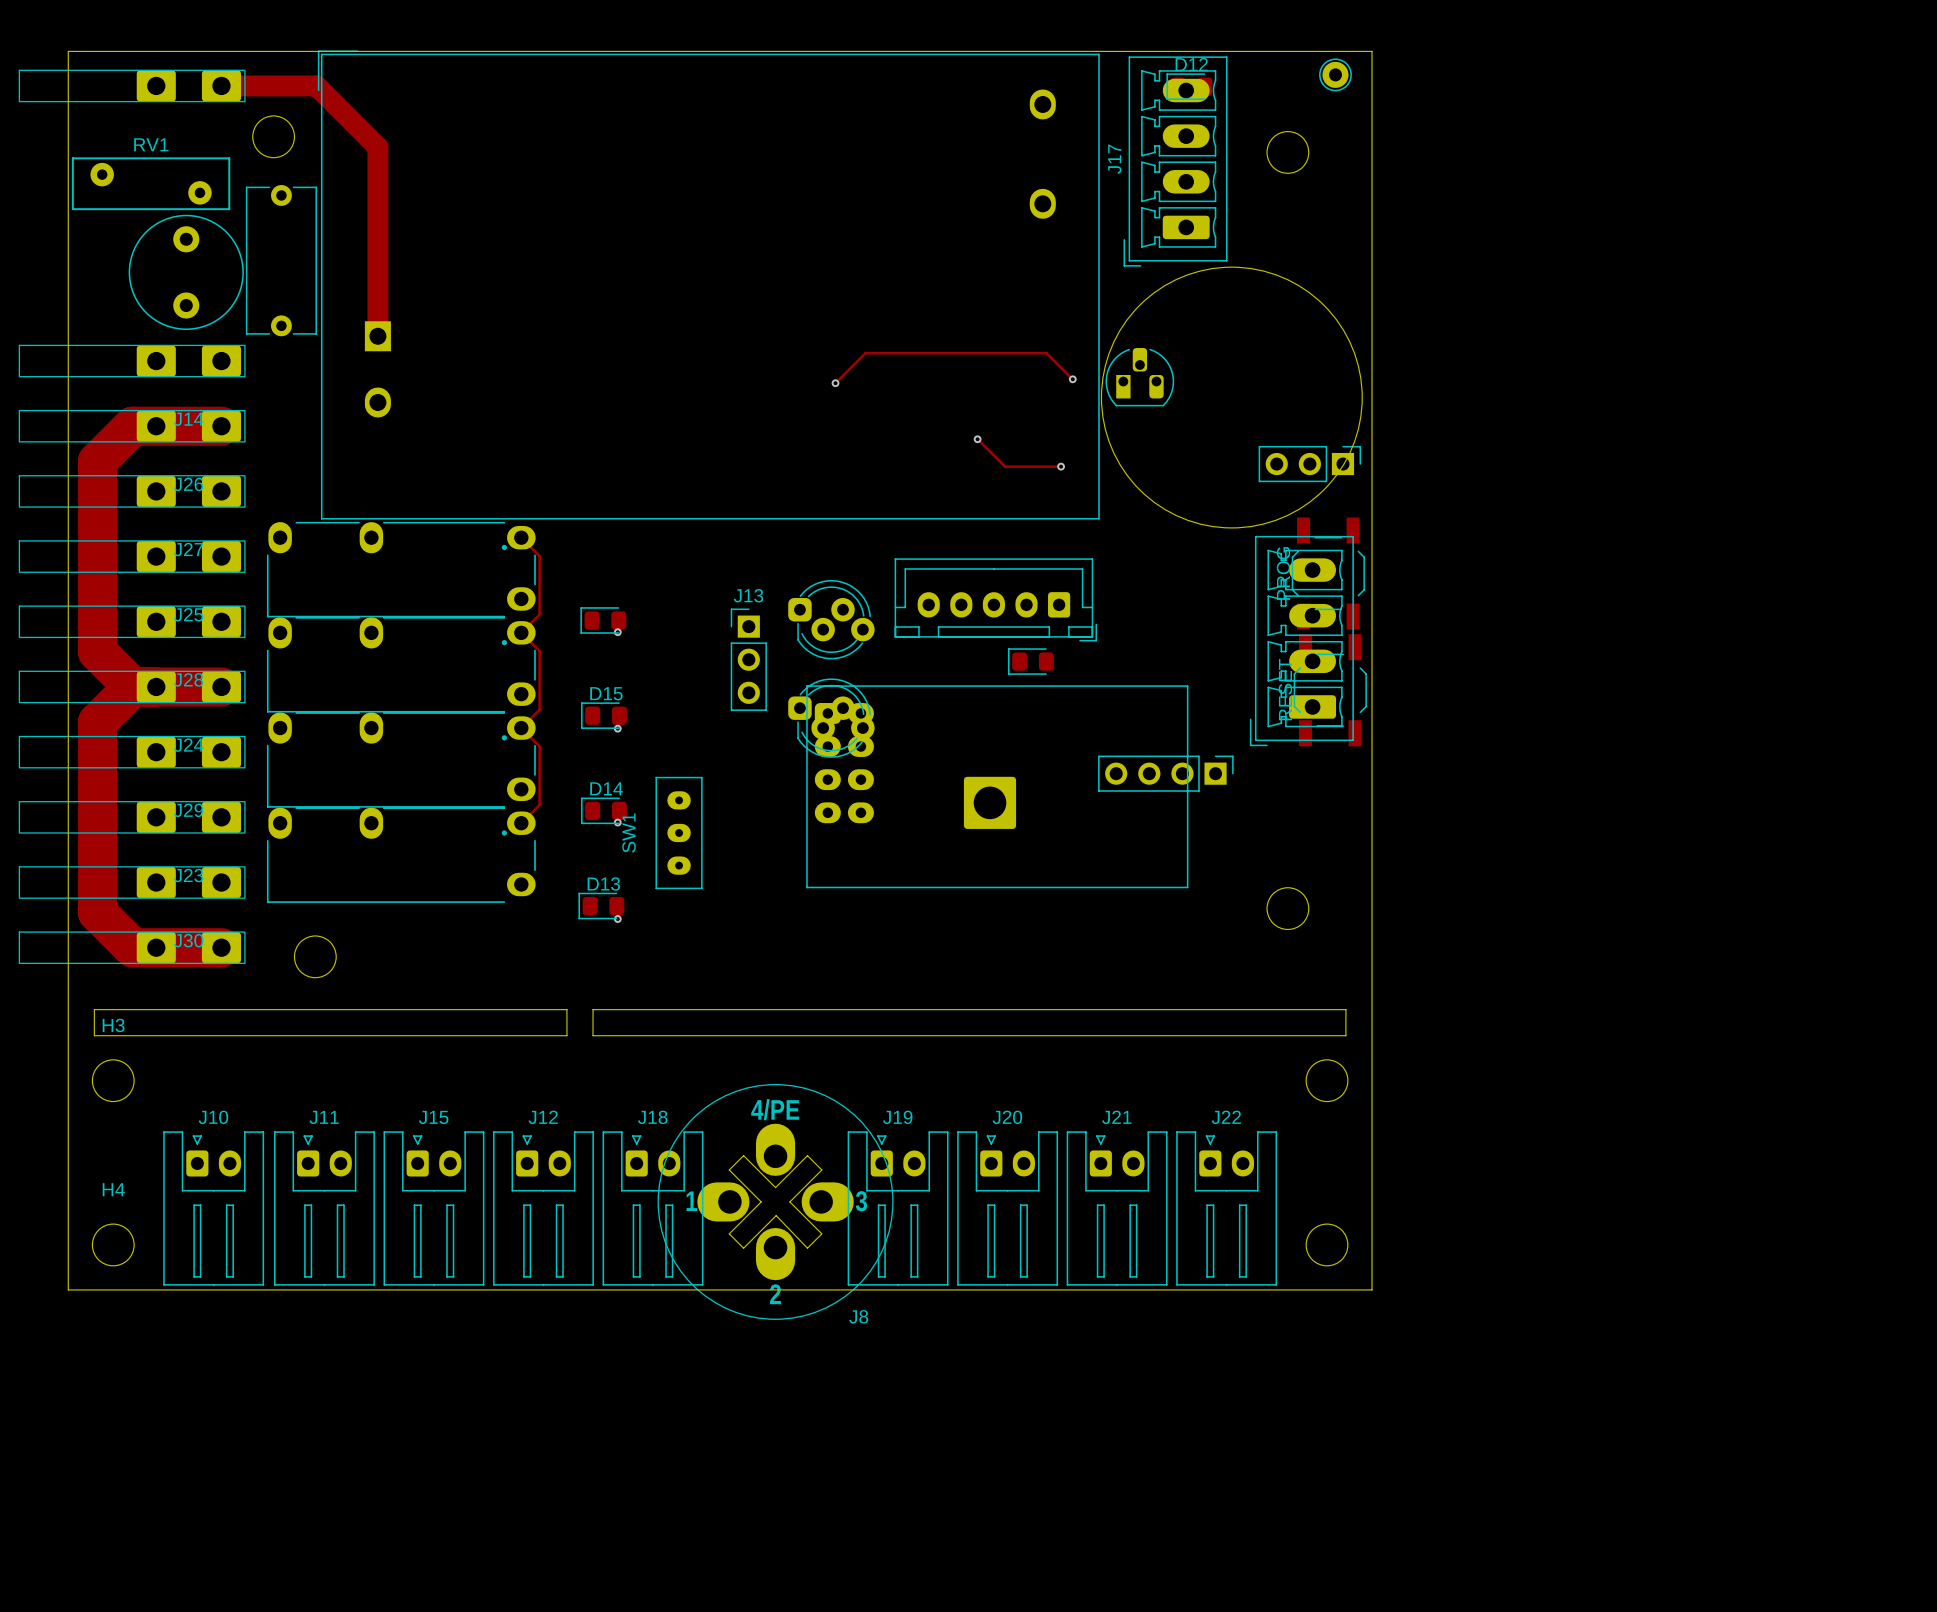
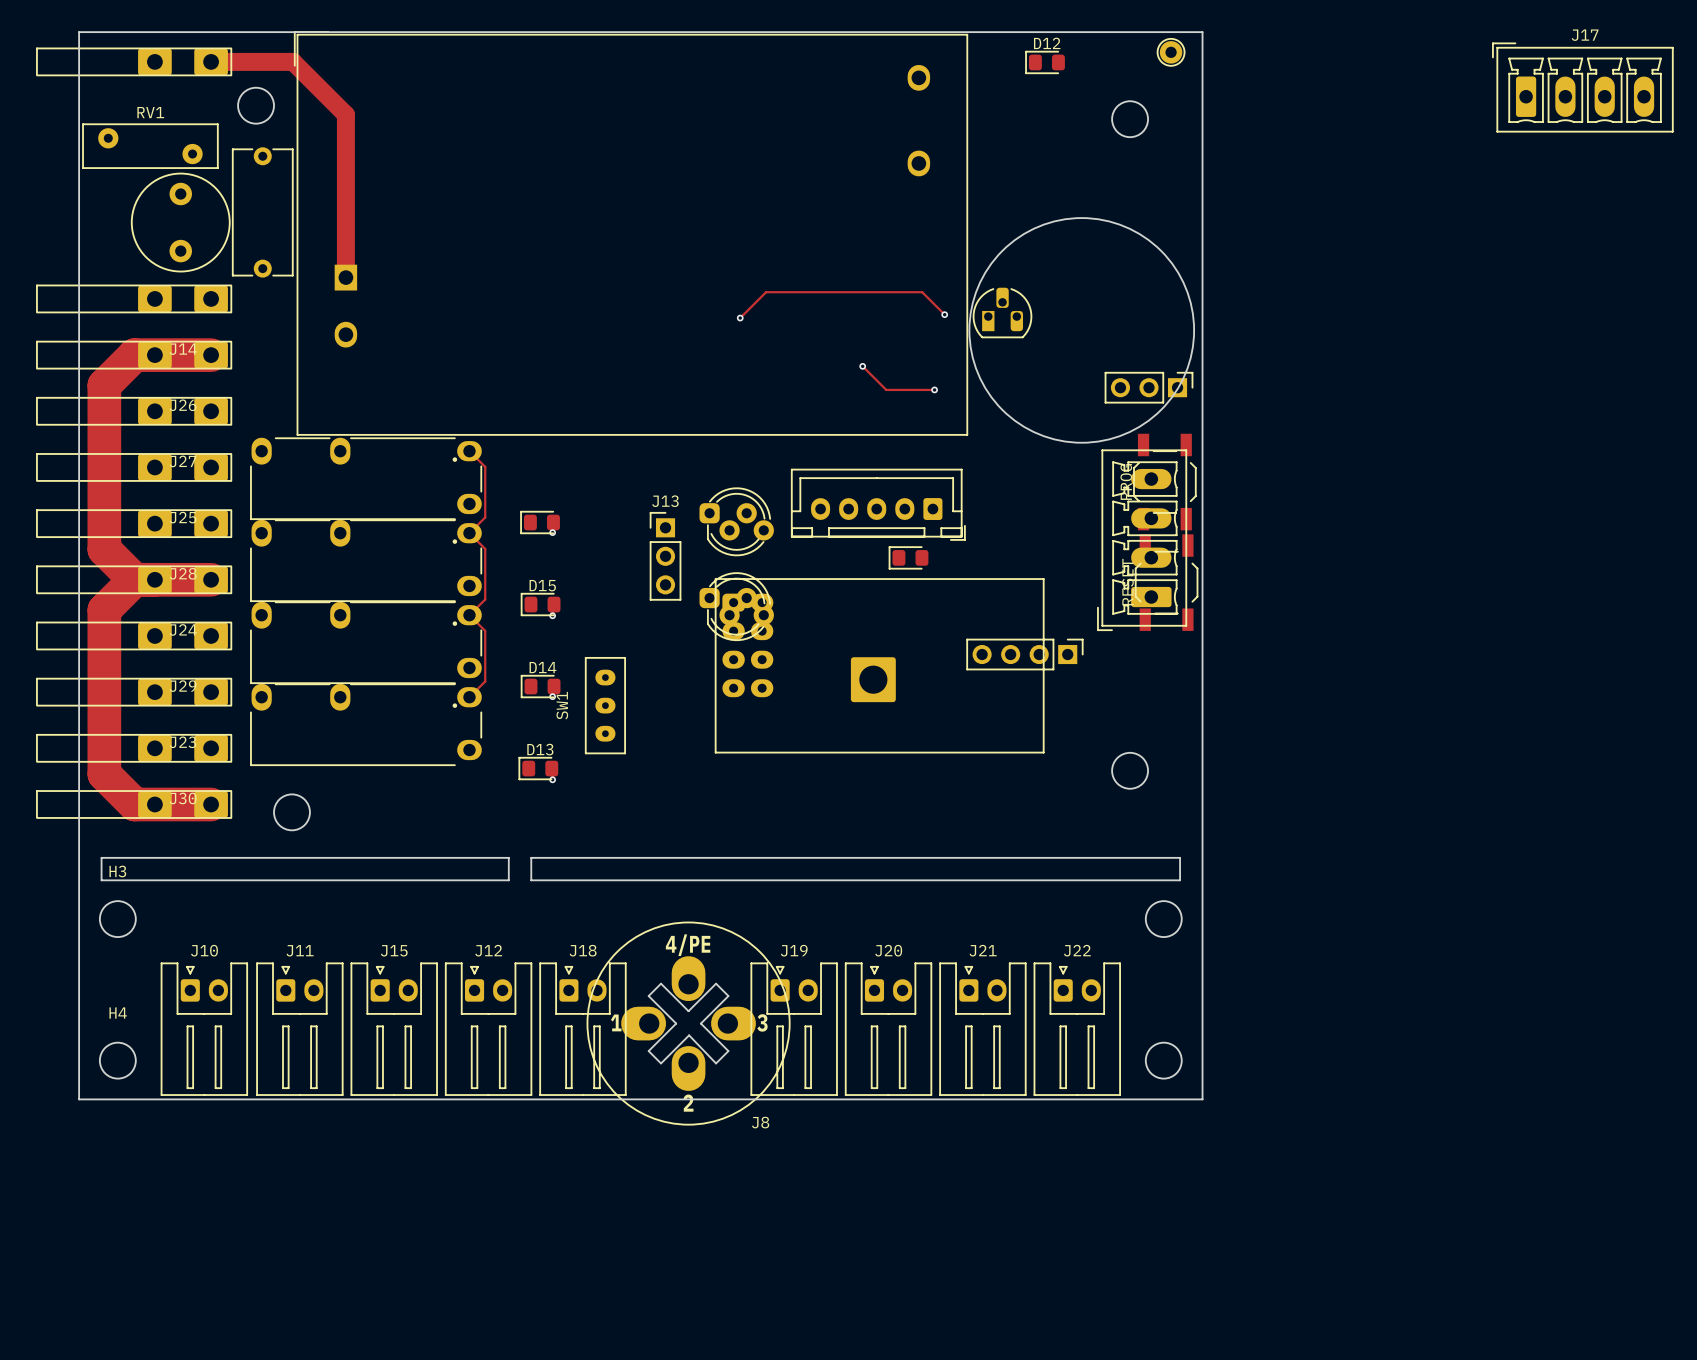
J17 rotation: 0° (1175, 161) -> 90° clockwise (1582, 87)
J17 position: (1175, 161) -> (1582, 87)

